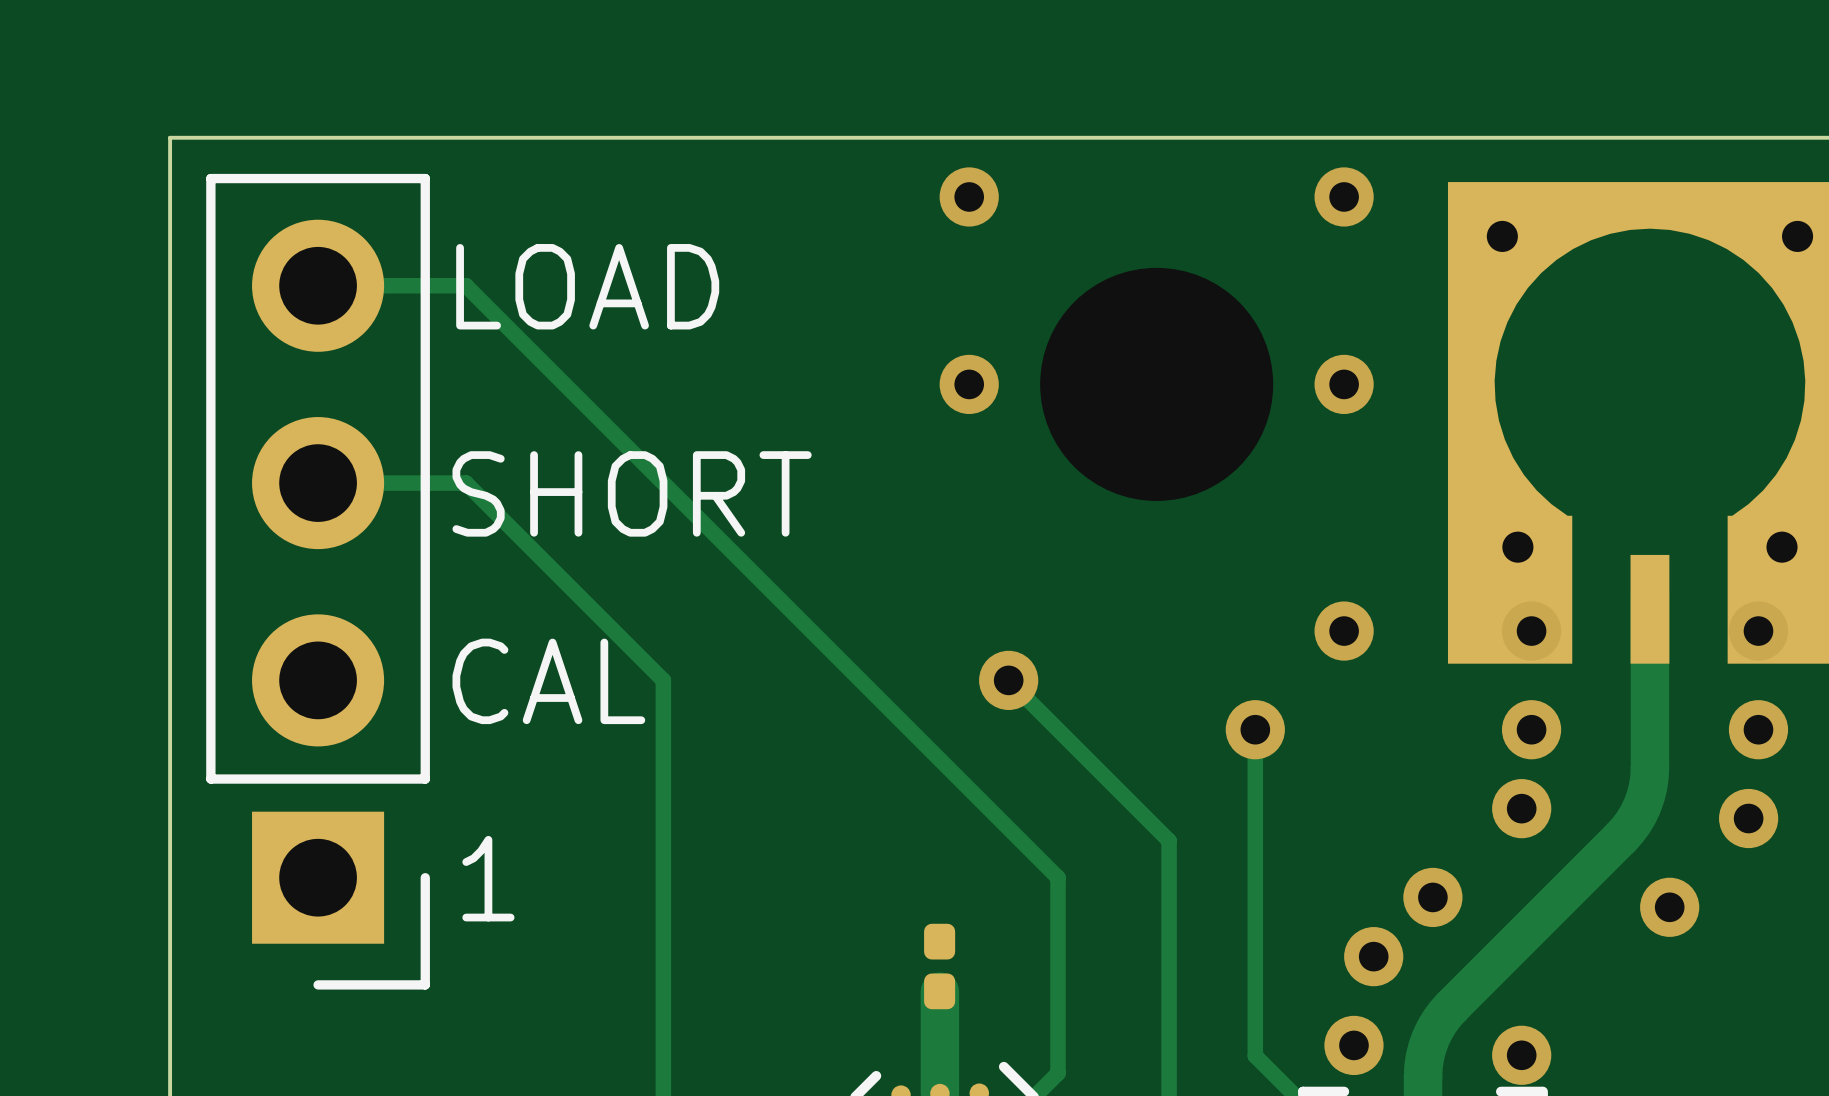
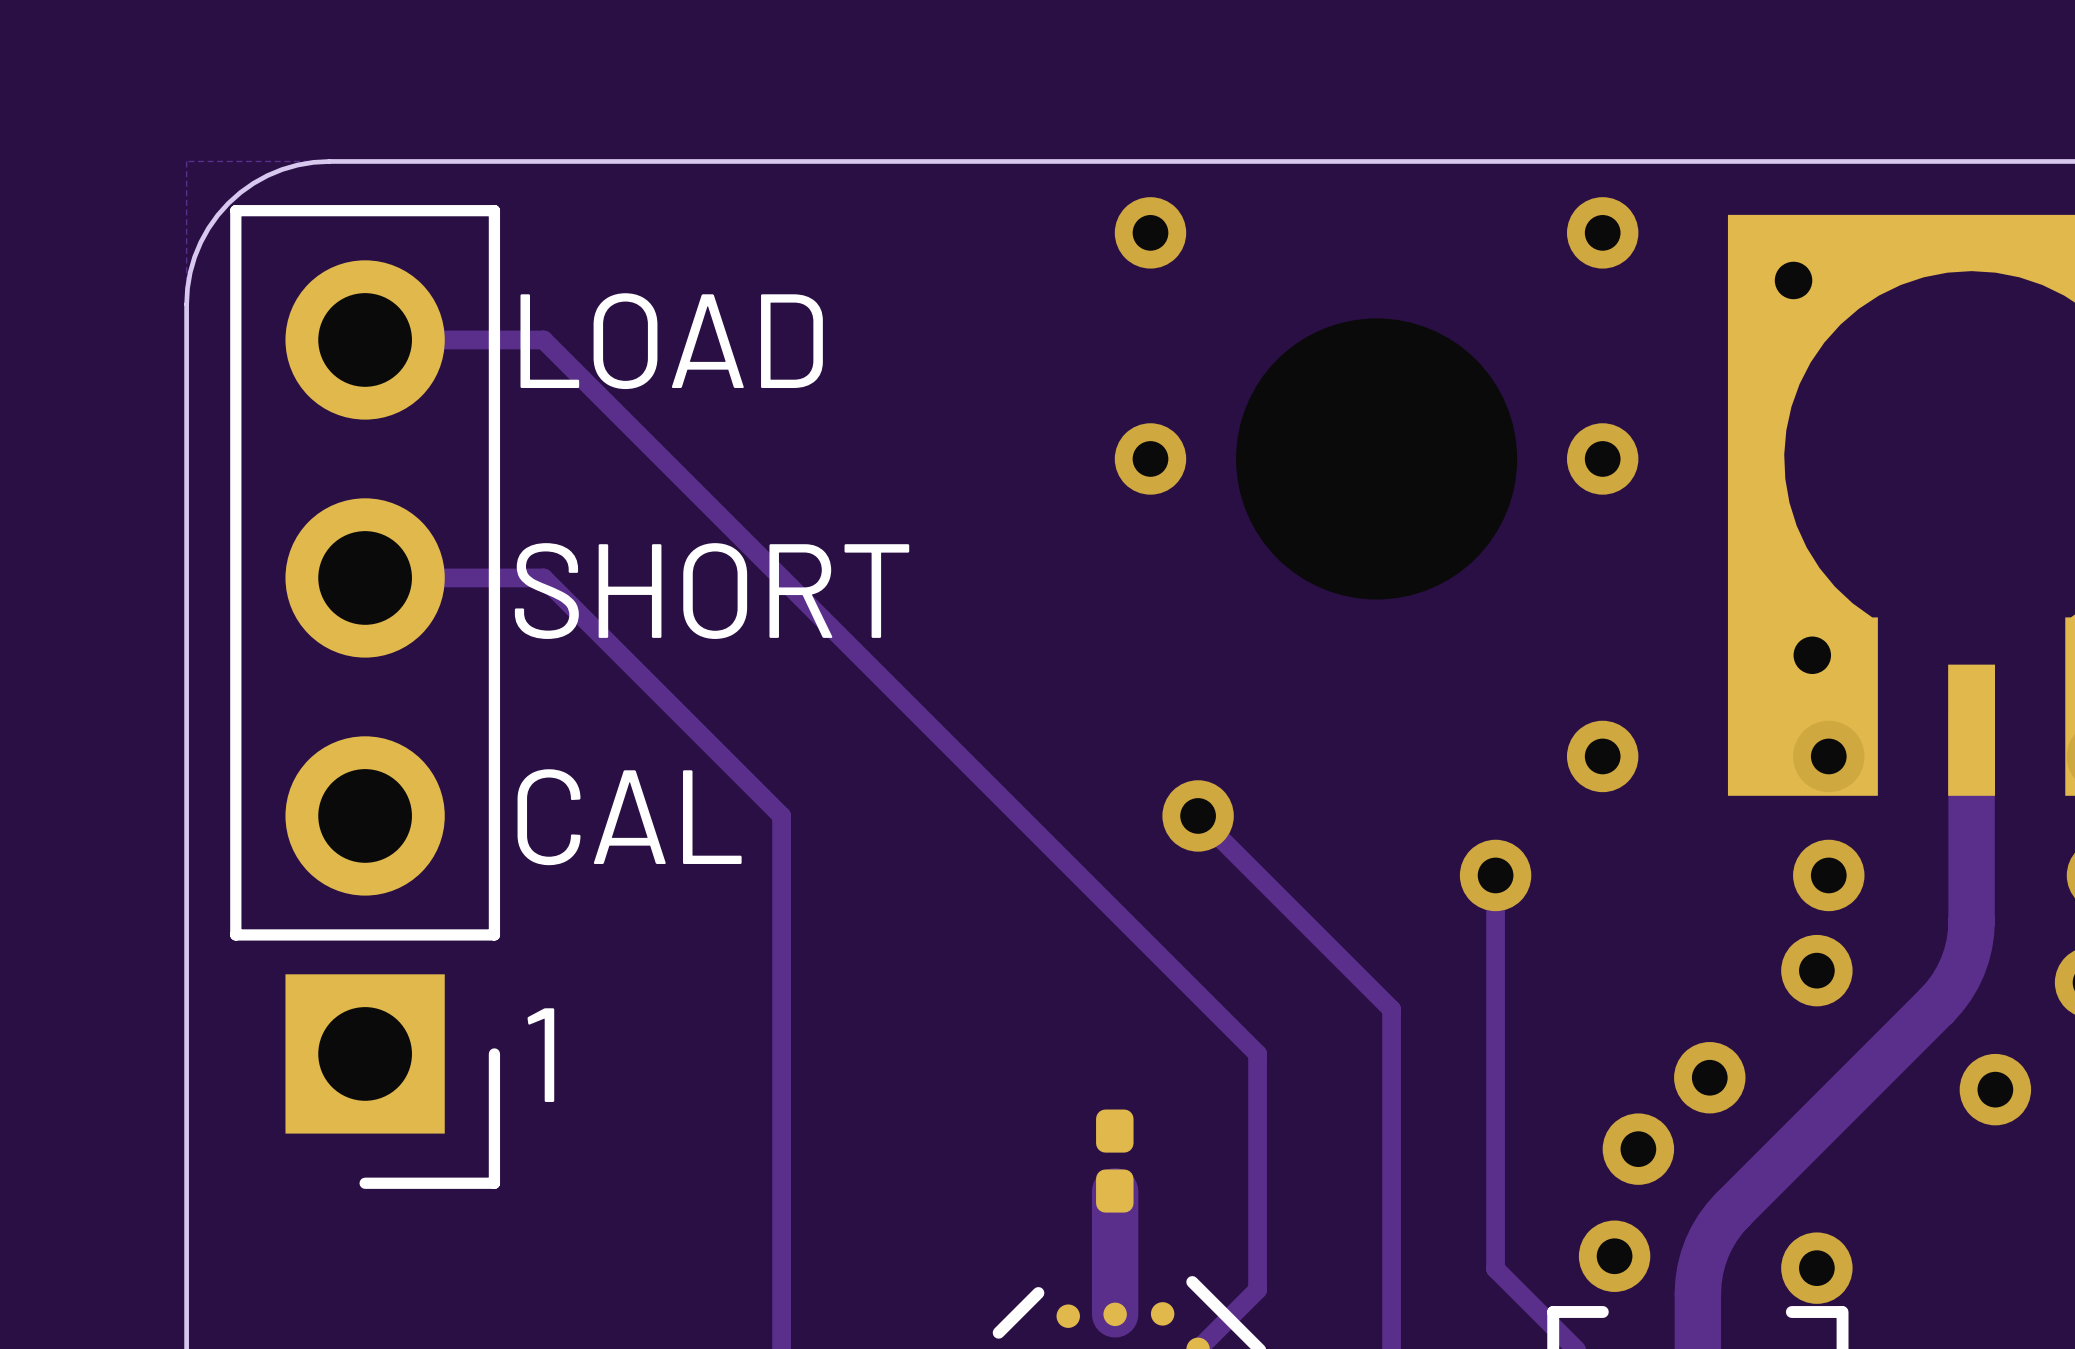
board edge: (288, 137) (170, 137) (170, 256) -> (329, 161) (297, 165) (267, 175) (253, 183) (228, 203) (217, 215) (200, 242) (190, 272) (186, 304)

